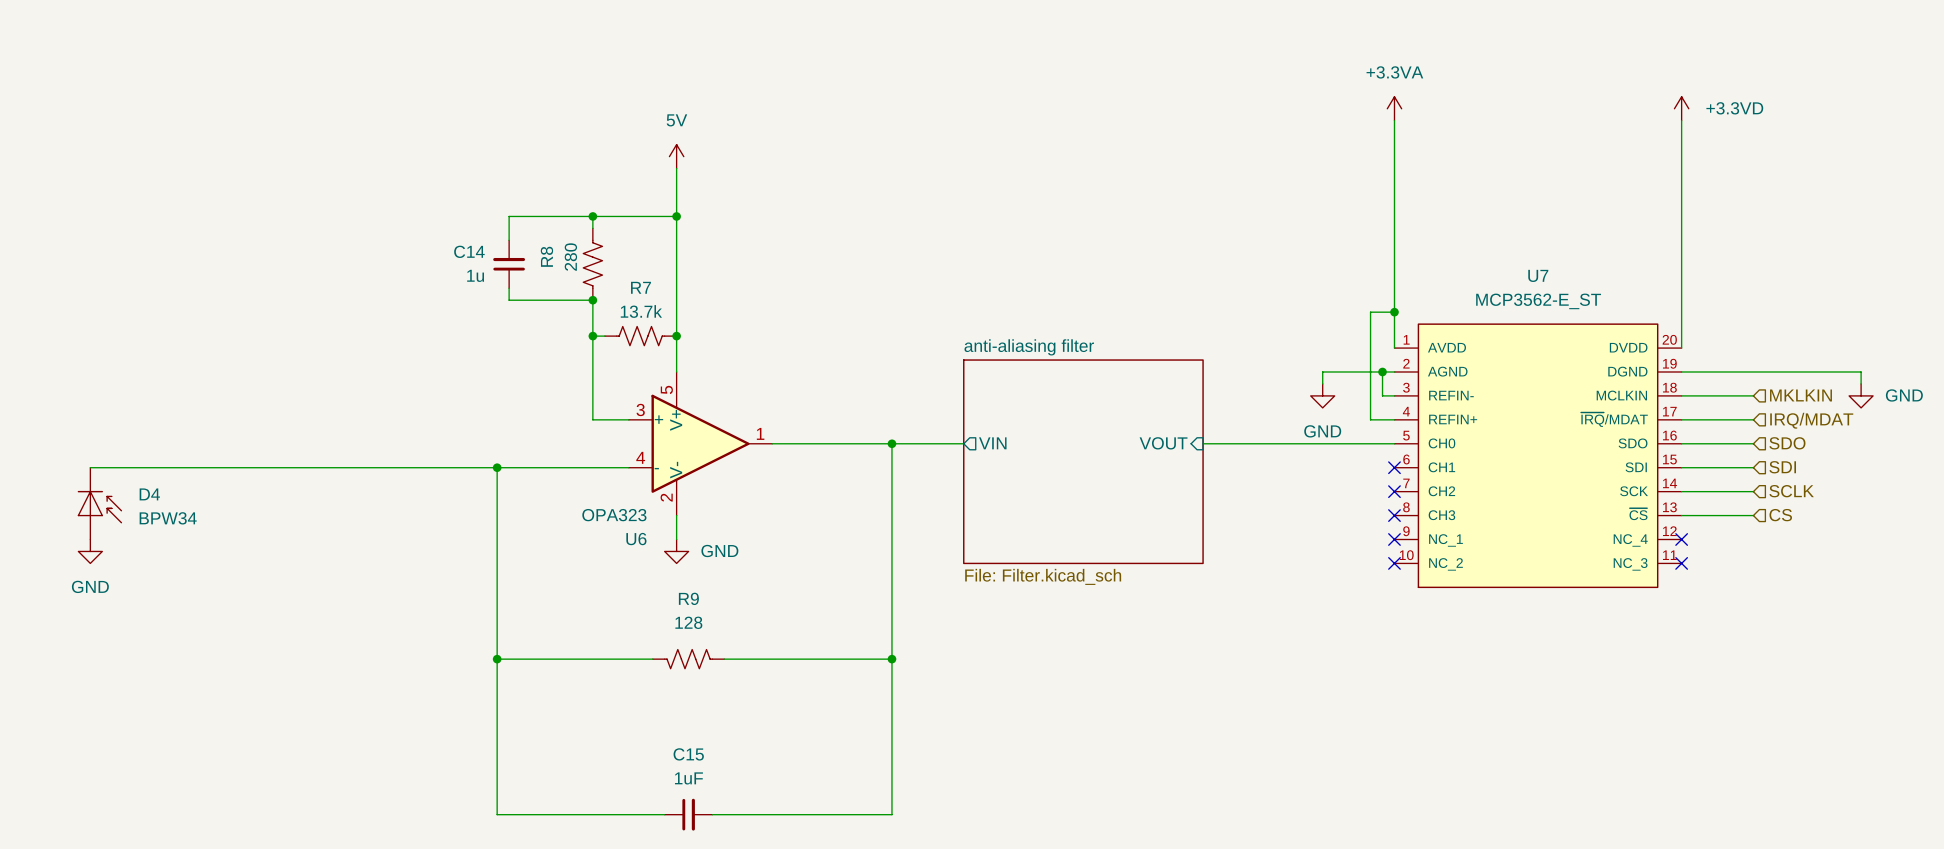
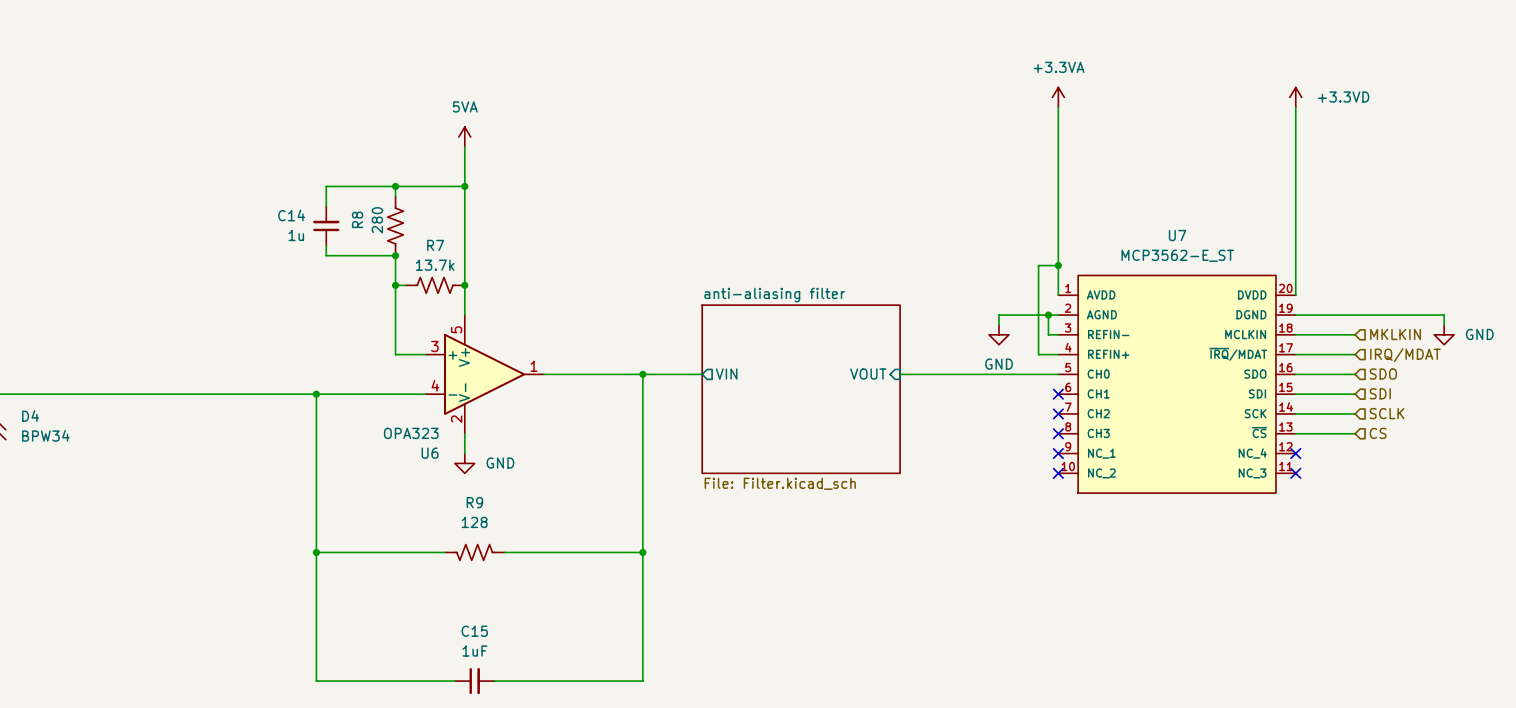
power symbol: 5V (676, 156) -> 5VA (464, 136)

